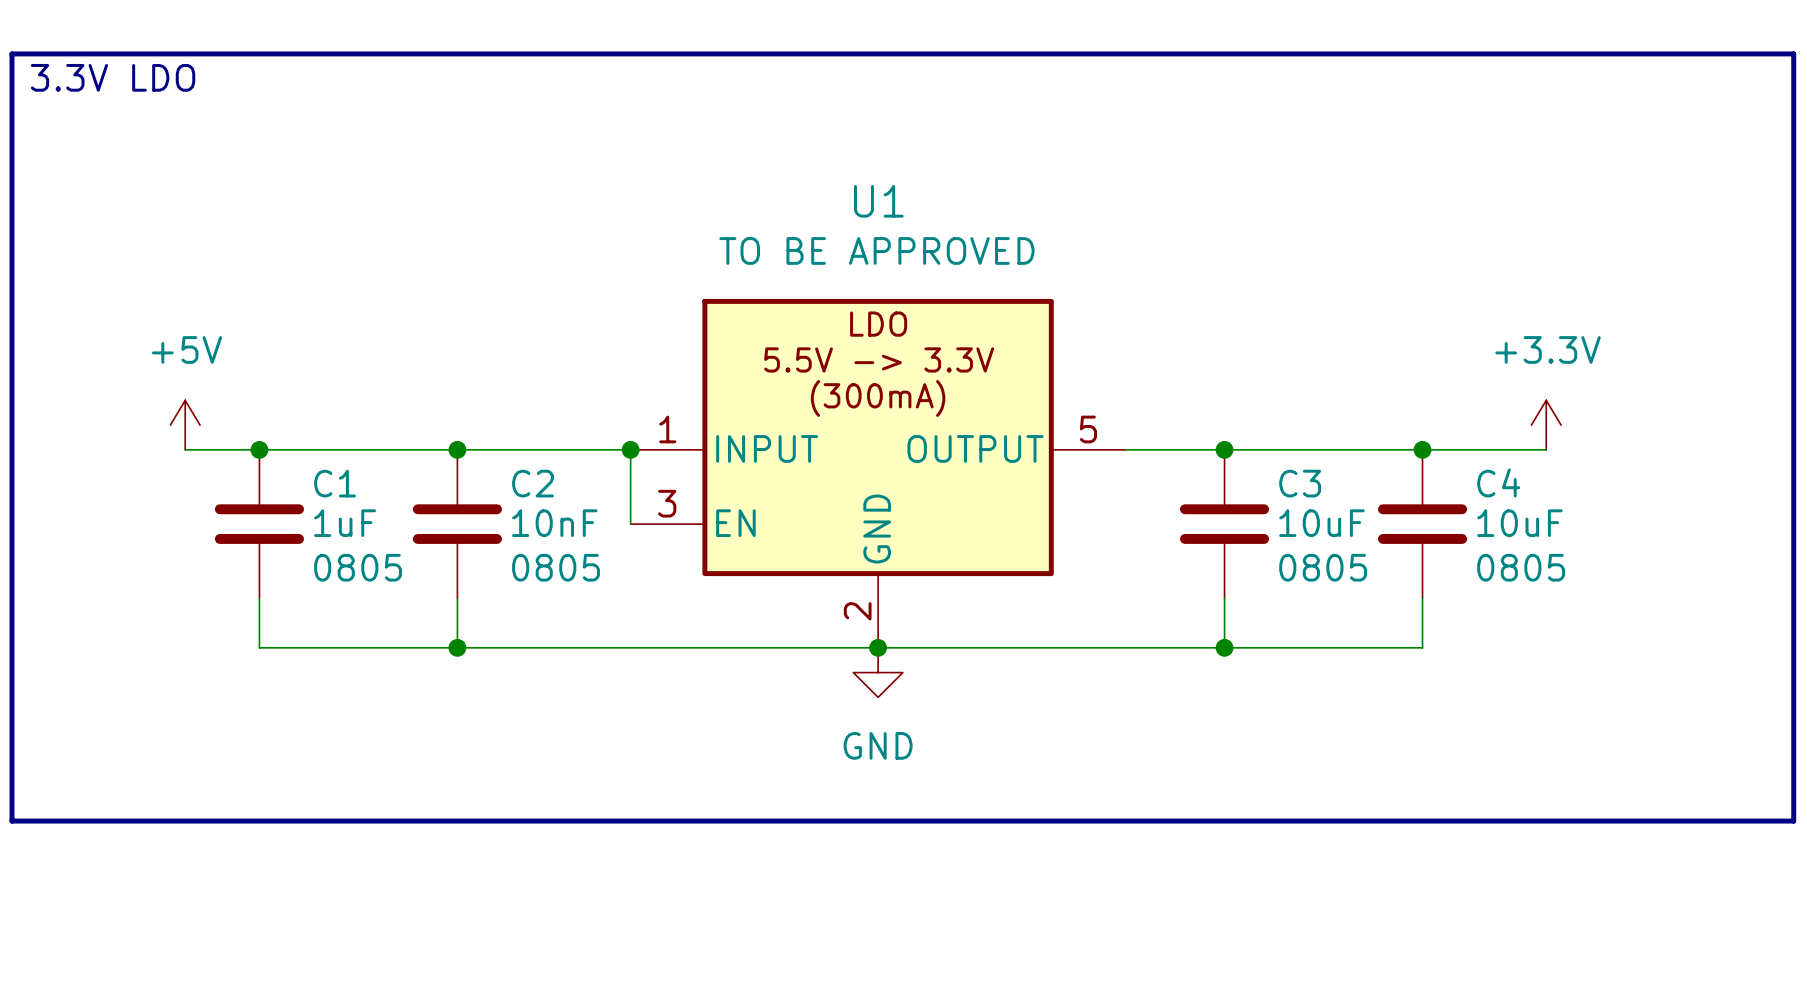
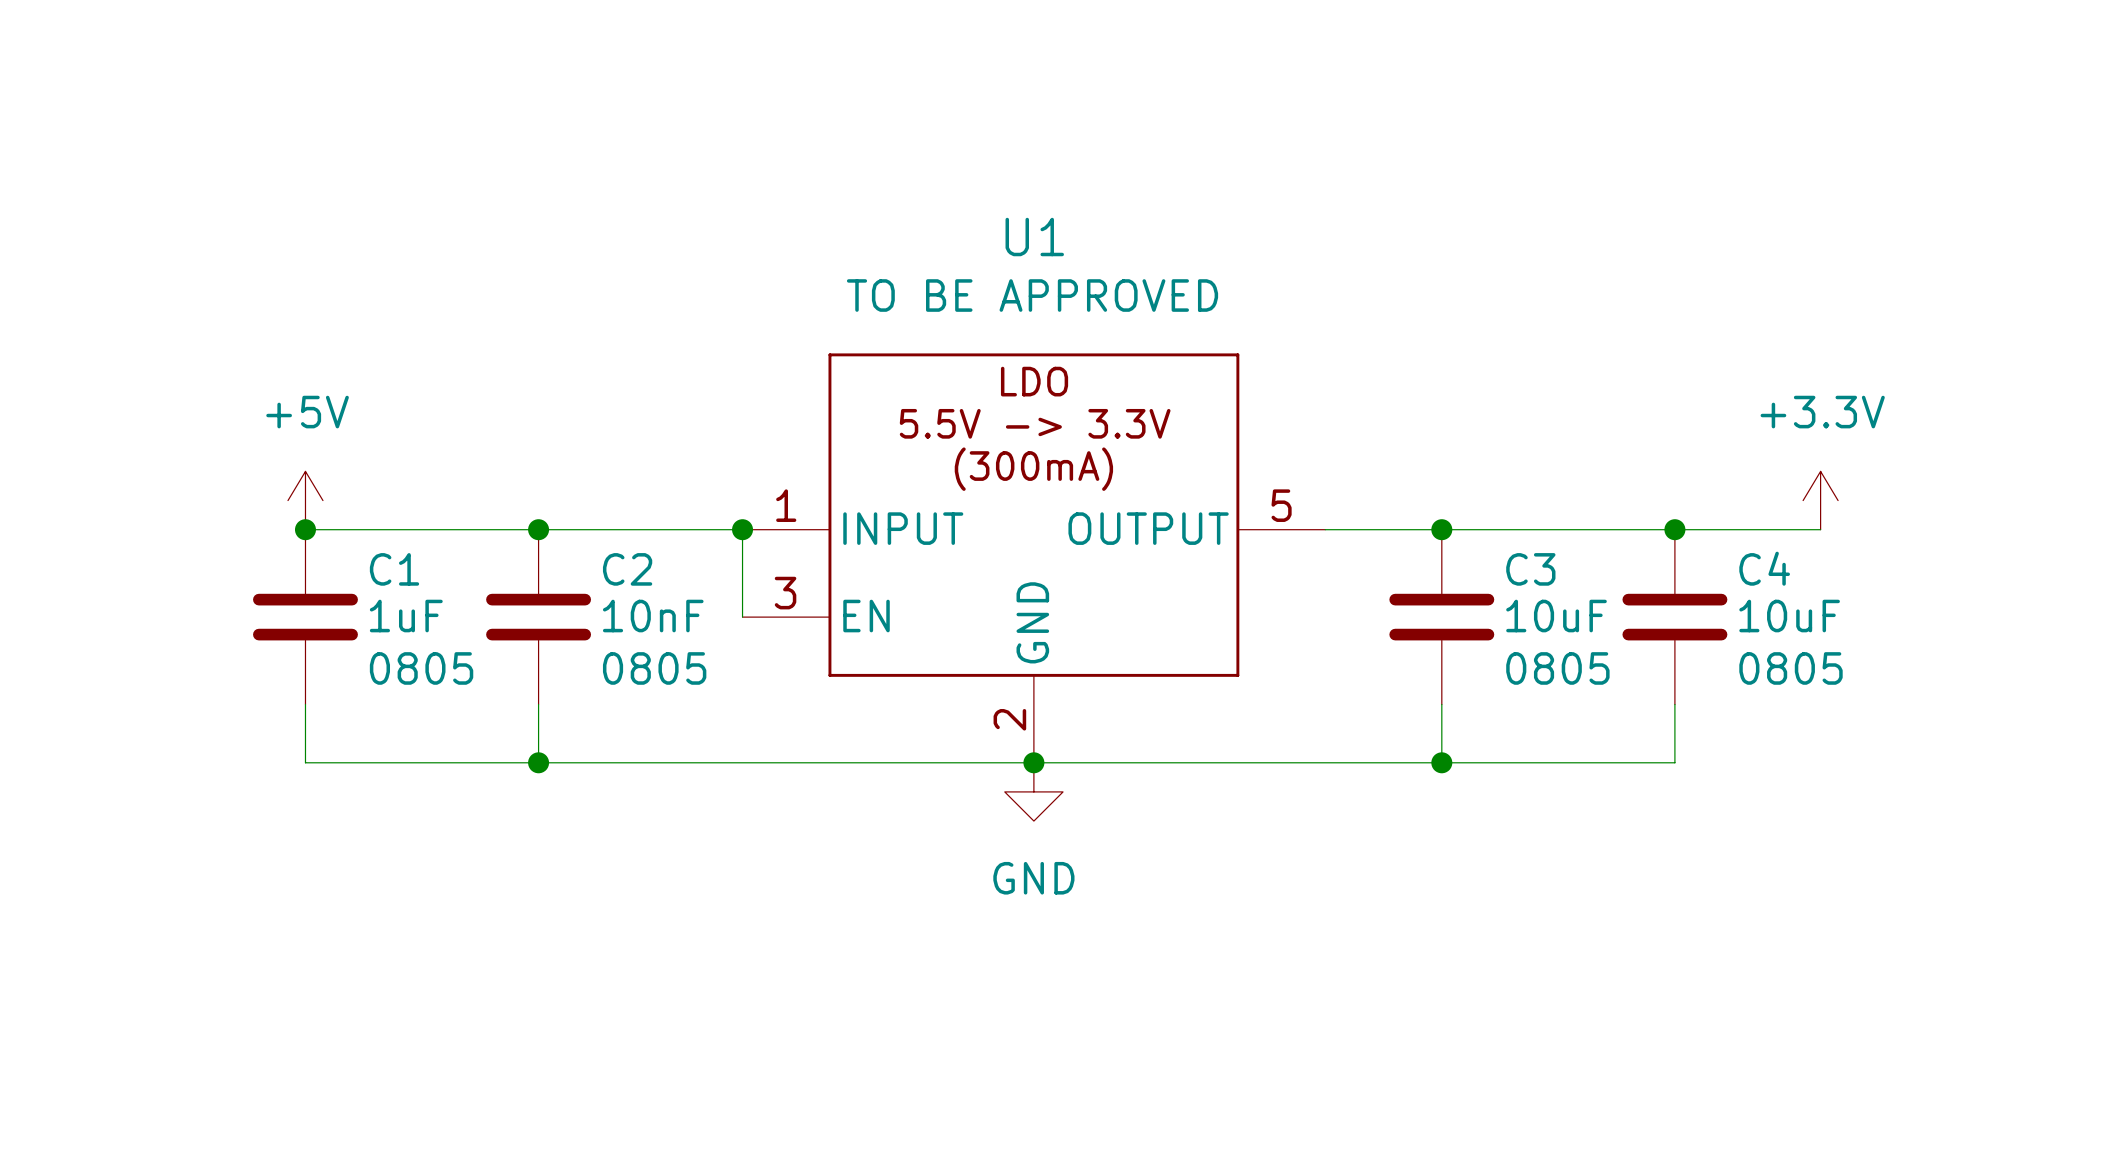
line: (11, 53) (1793, 53) (1793, 821) (11, 821) (11, 53) -> none
text: 3.3V LDO (113, 77) -> none
U1 symbol: [630, 298, 1126, 648] -> [742, 353, 1326, 763]
power symbol position: +5V (185, 425) -> +5V (305, 500)
wire: (185, 449) (259, 449) -> none

